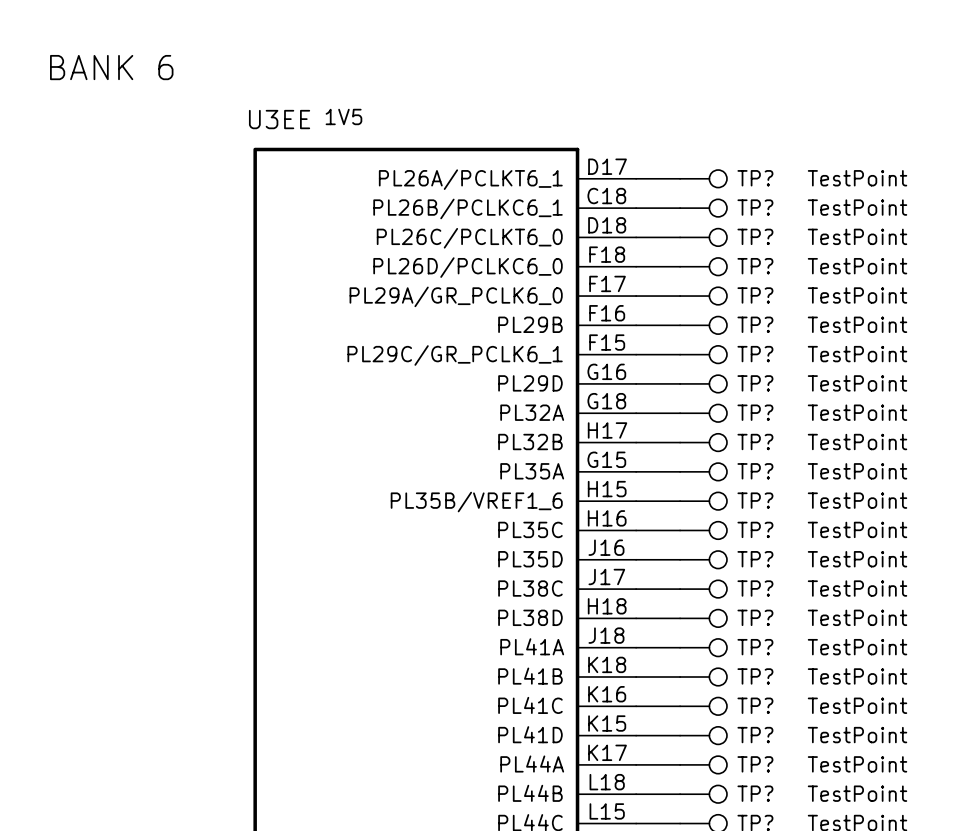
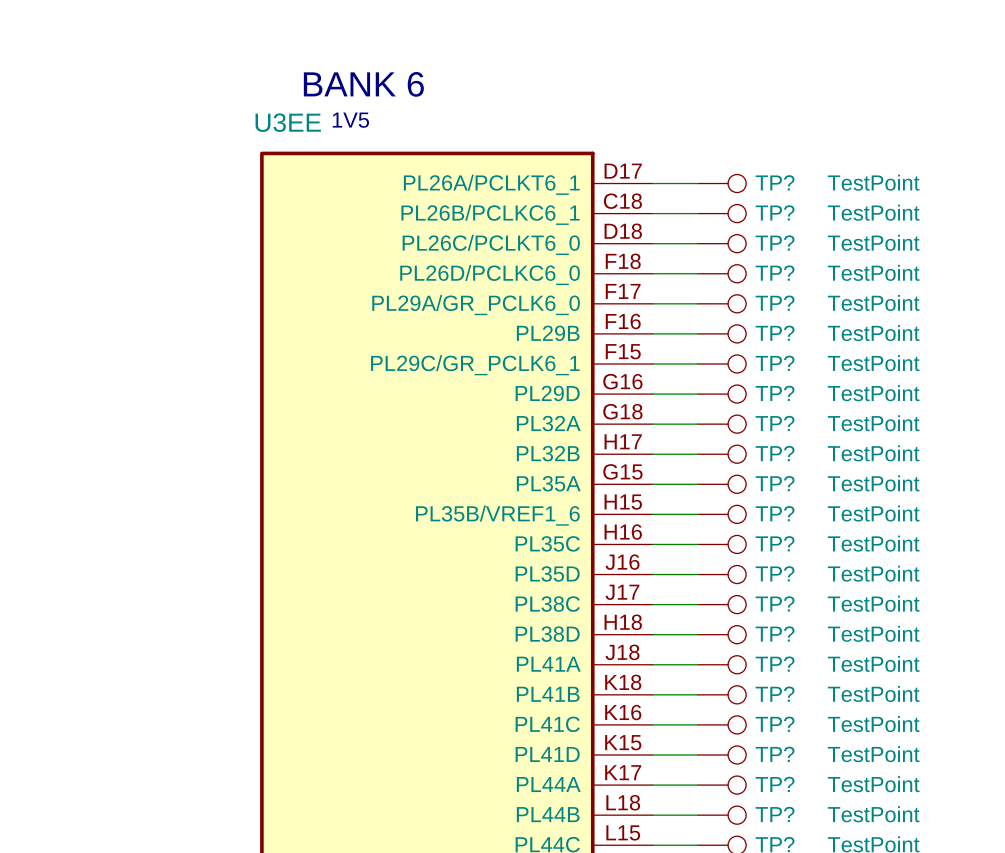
text position: BANK 6 (111, 67) -> BANK 6 (363, 84)

